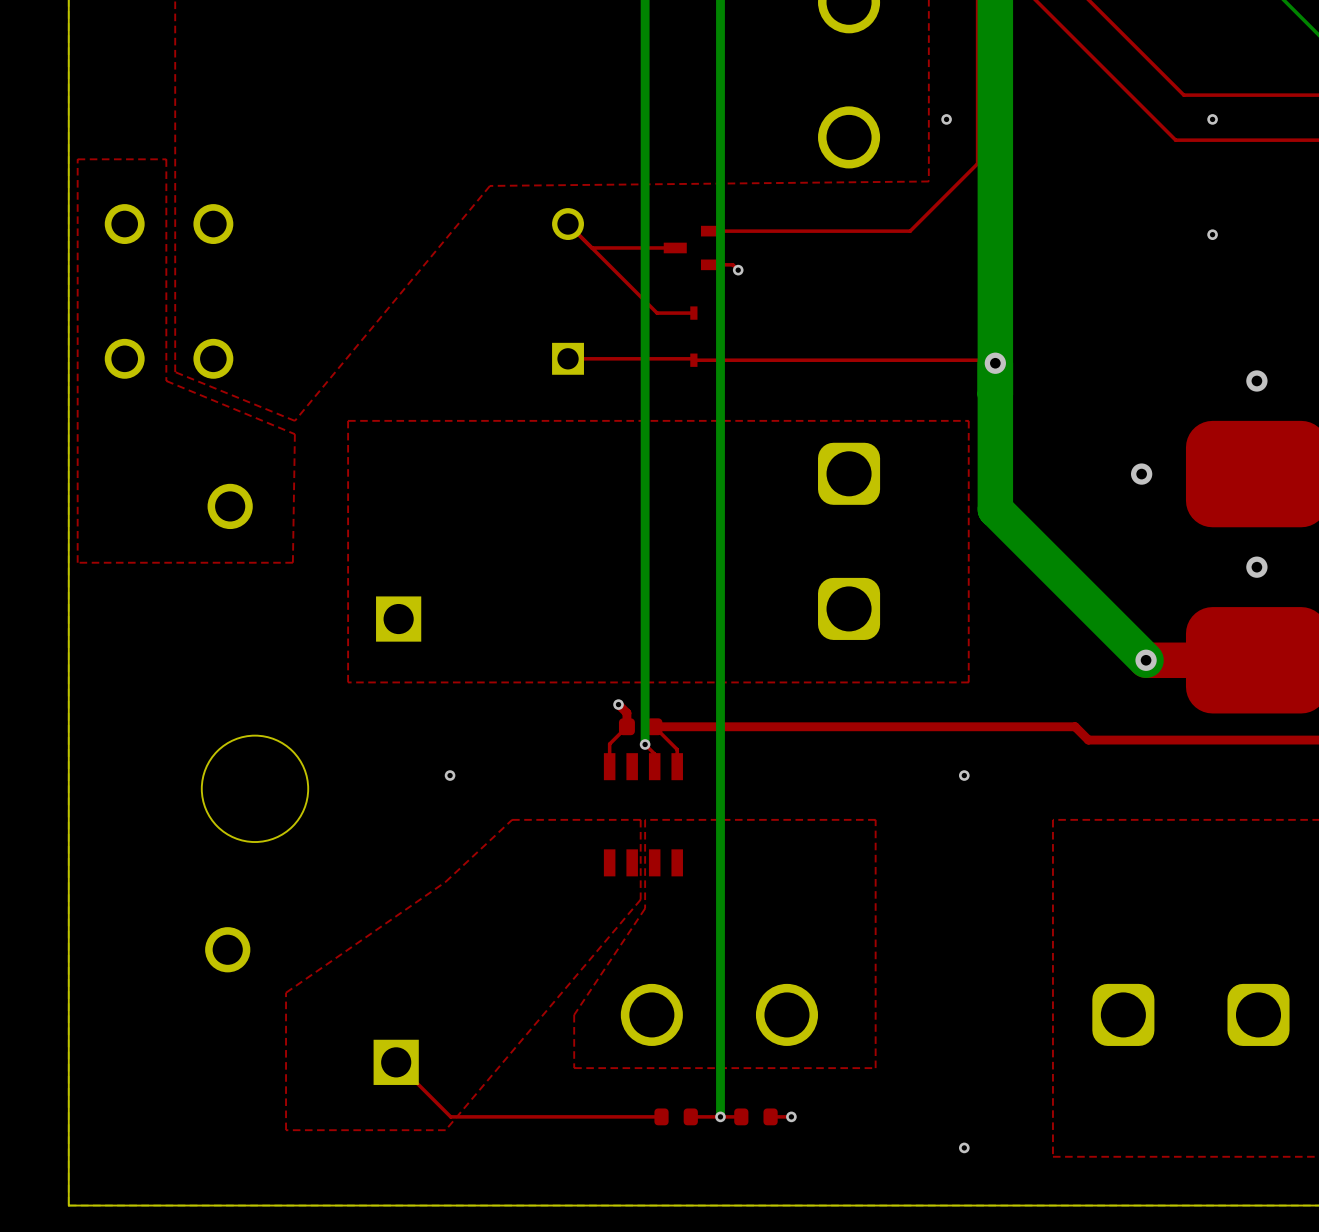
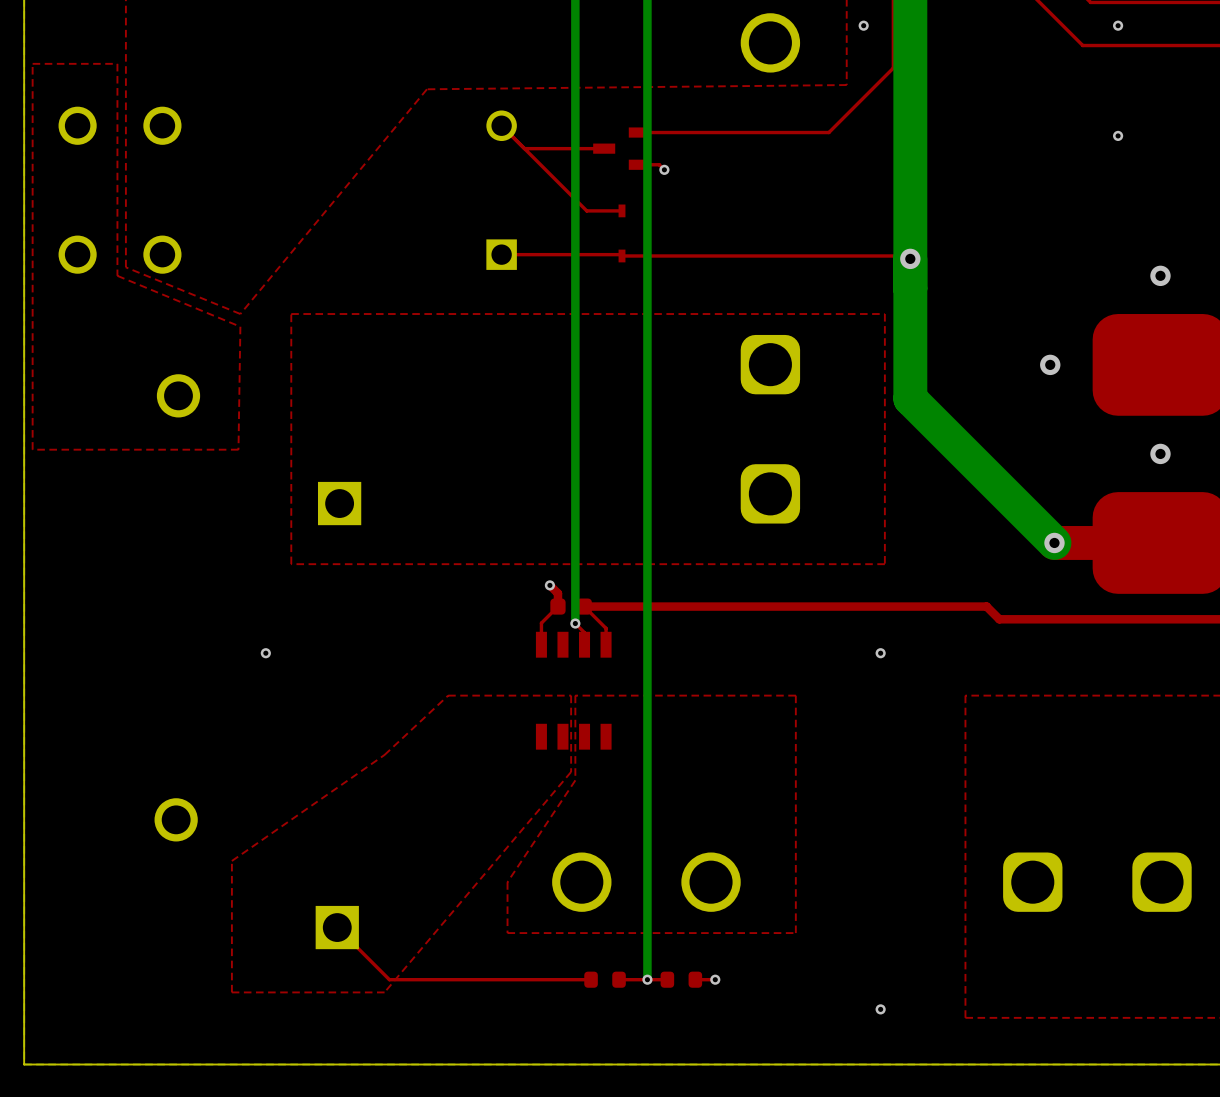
round board edge: [201, 735, 309, 843] -> none
via: none -> (265, 653)
via: (450, 775) -> none

